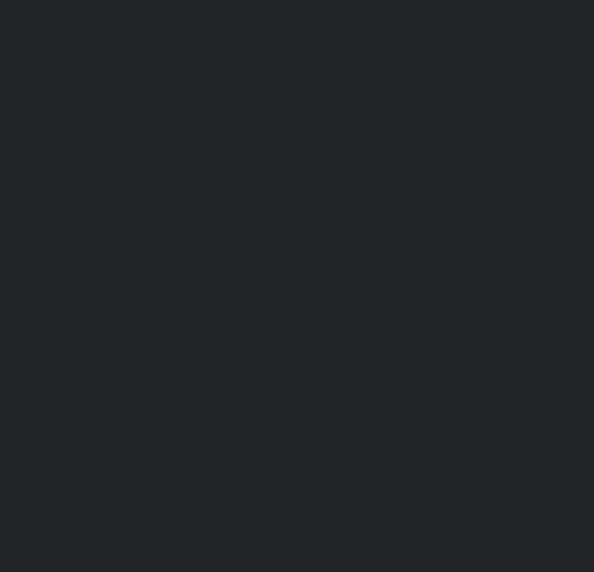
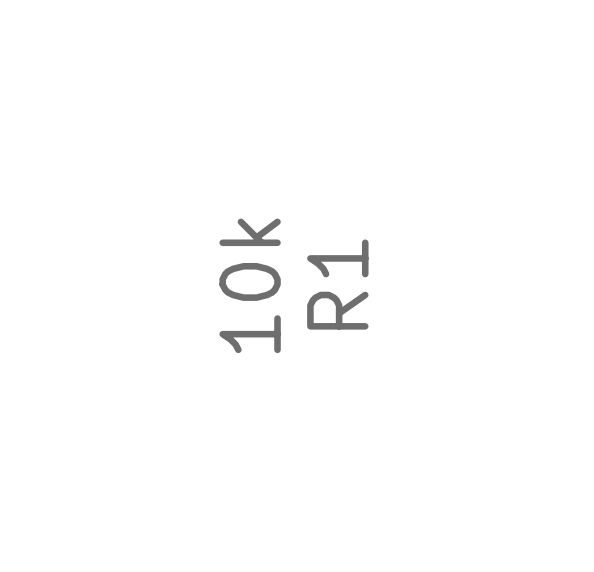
R1: none -> 10k (293, 285)

